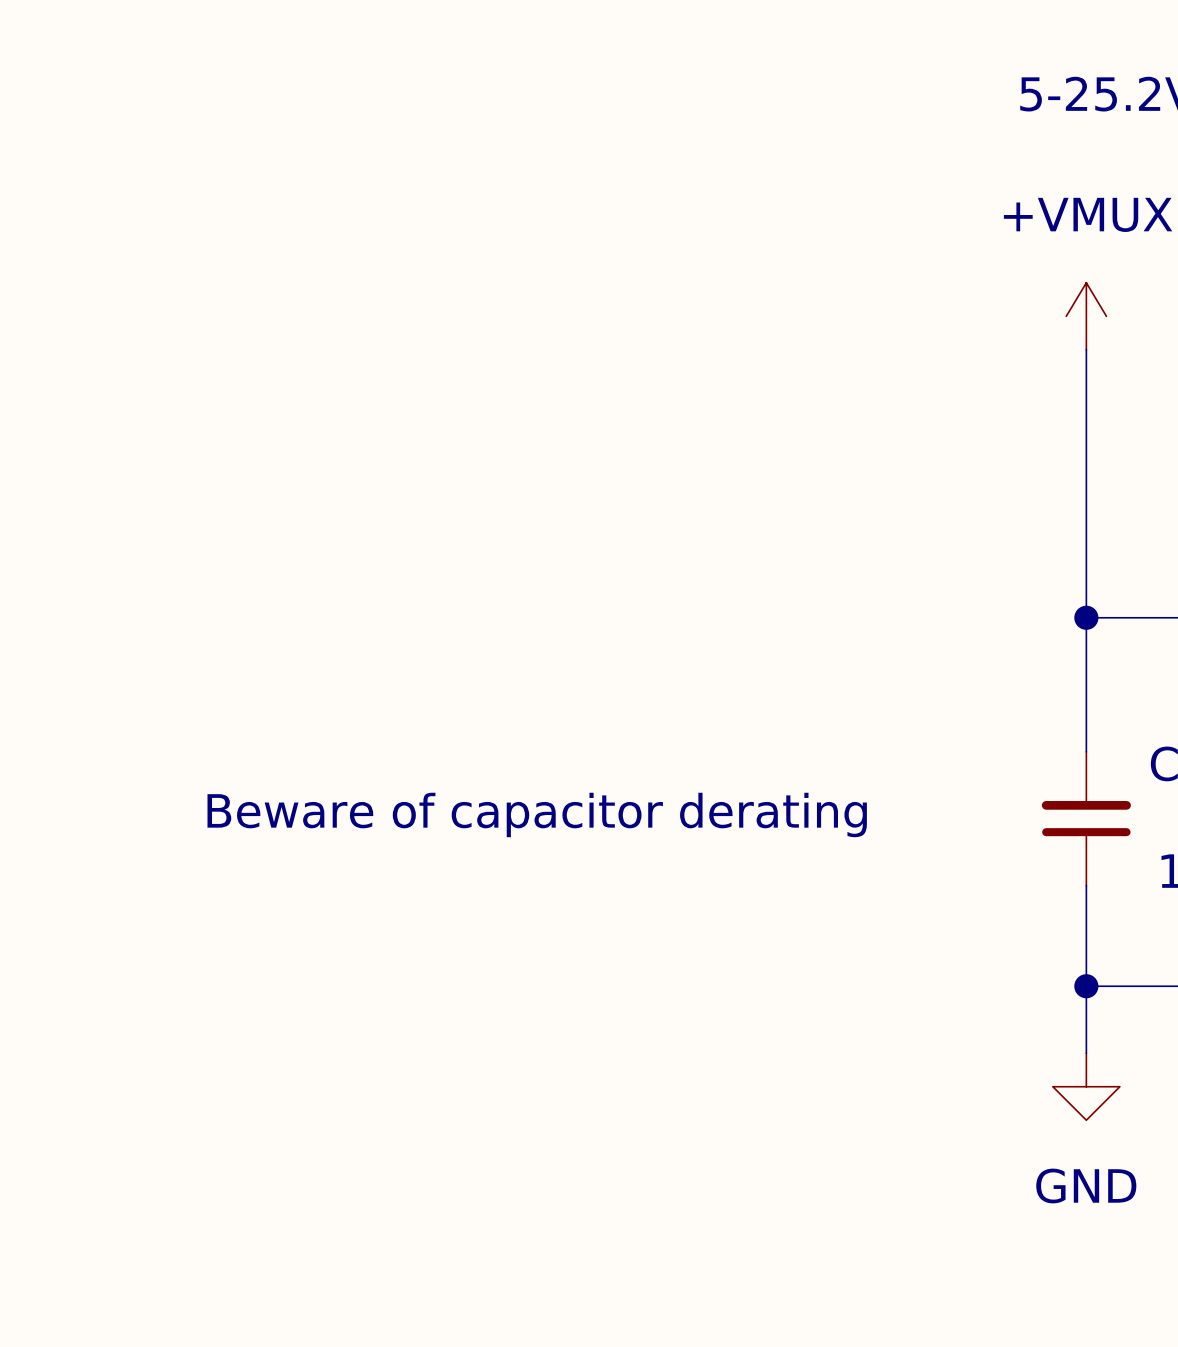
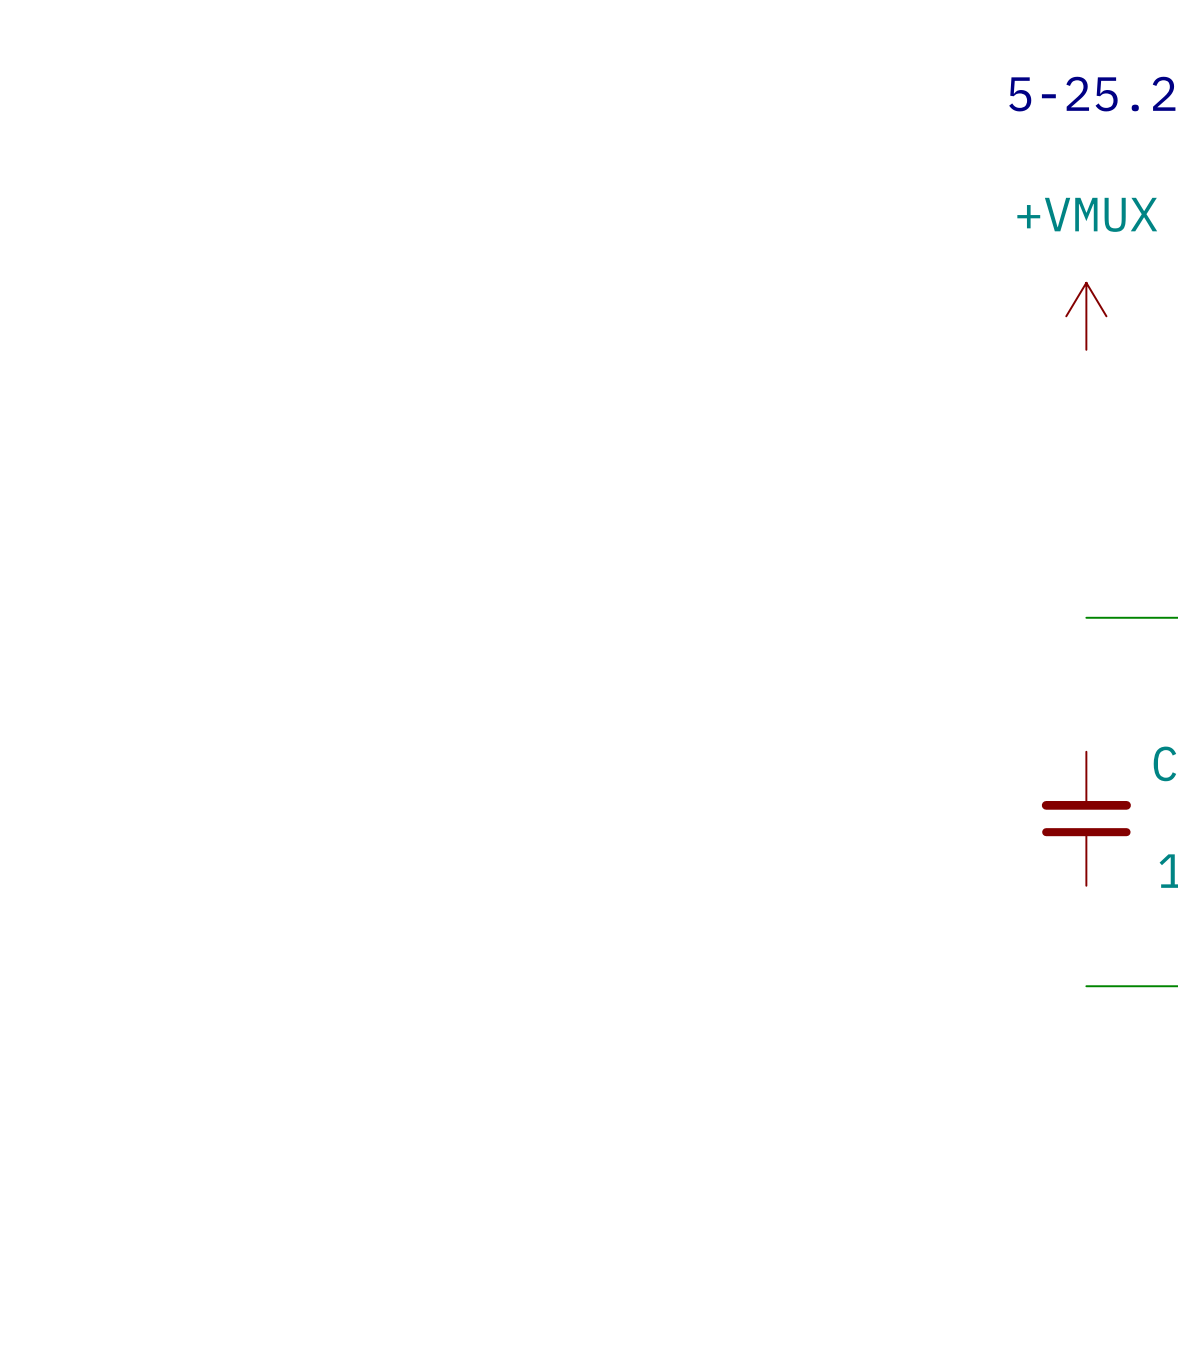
wire: (1086, 349) (1086, 751) -> none
junction: (1086, 617) -> none
text: Beware of capacitor derating (537, 814) -> none
wire: (1086, 885) (1086, 1053) -> none
junction: (1086, 986) -> none
power symbol: GND (1086, 1086) -> none

